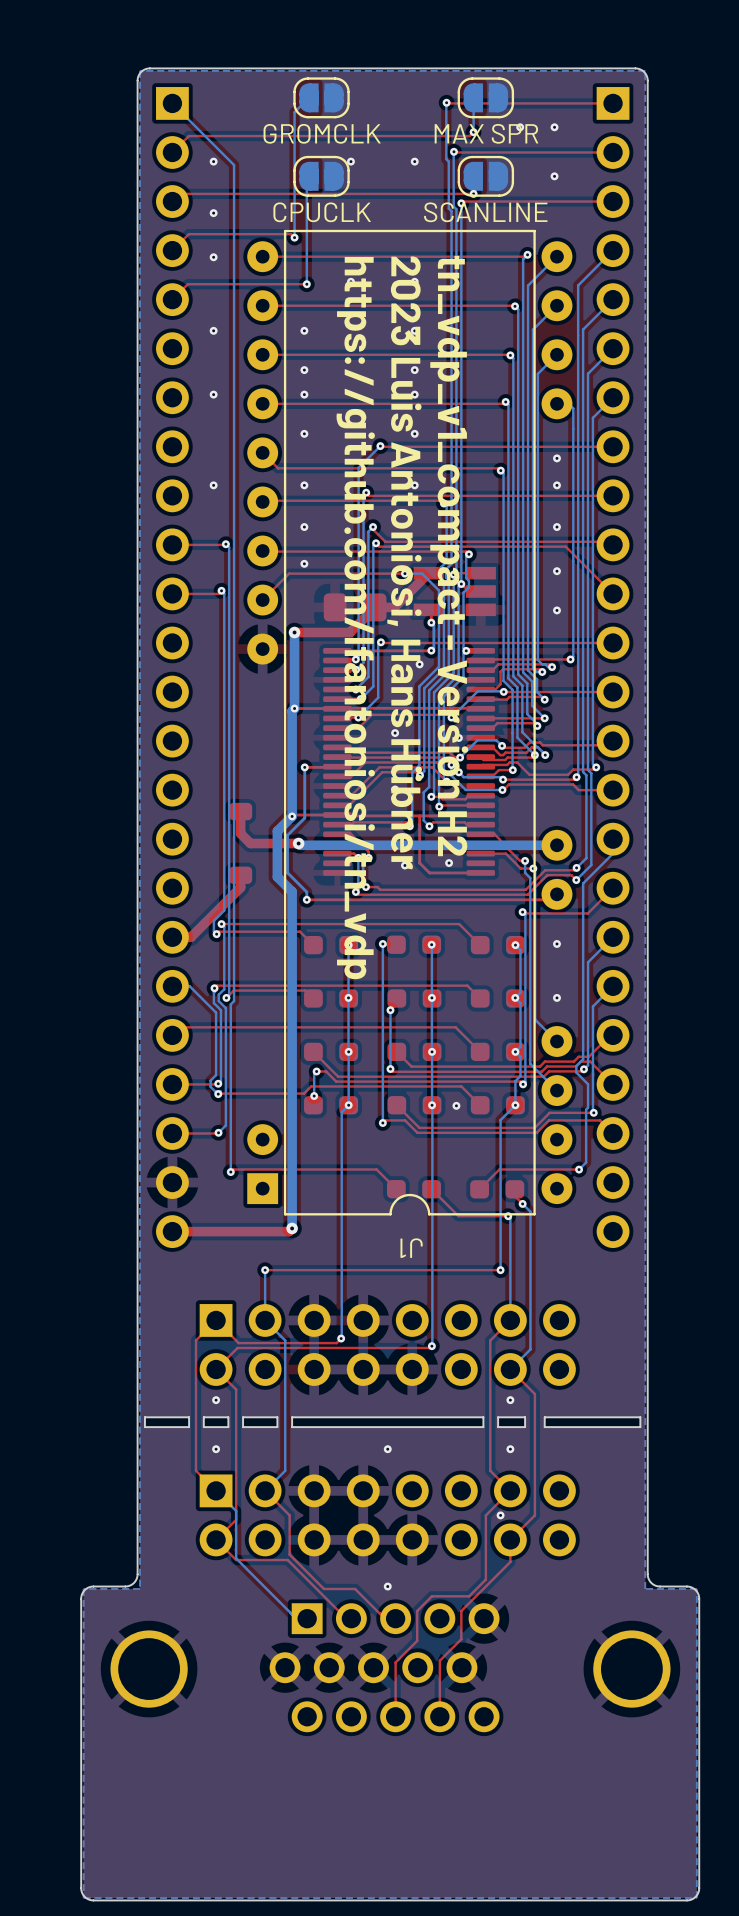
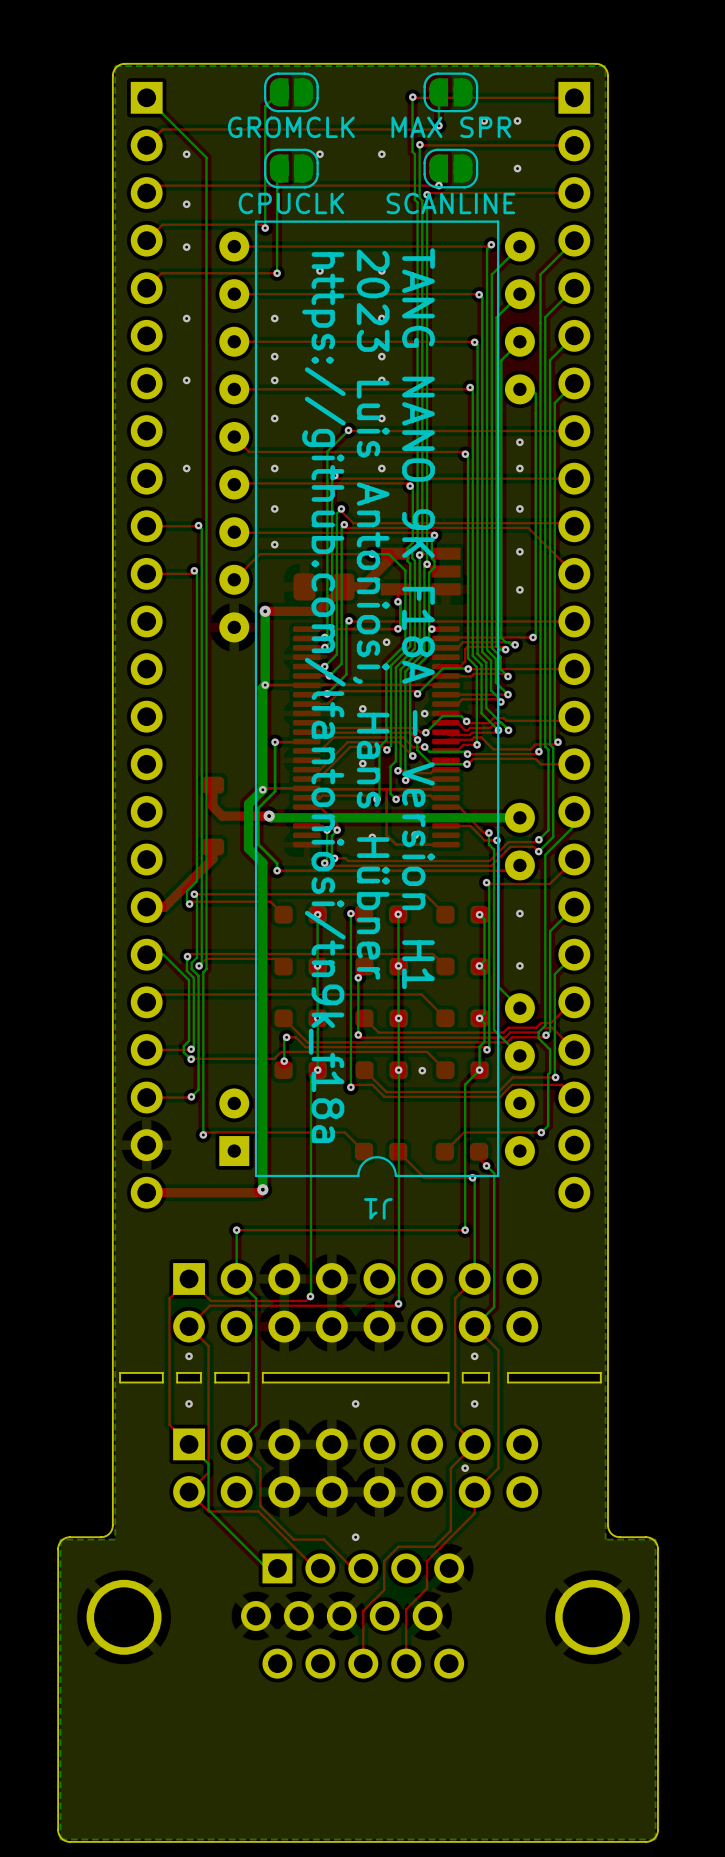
text: tn_vdp_v1_compact - Version H2 (449, 556) -> TANG NANO 9K F18A - Version H1 (418, 618)
text: https://github.com/lfantoniosi/tn_vdp (355, 618) -> https://github.com/lfantoniosi/tn9k_f18a (323, 697)

